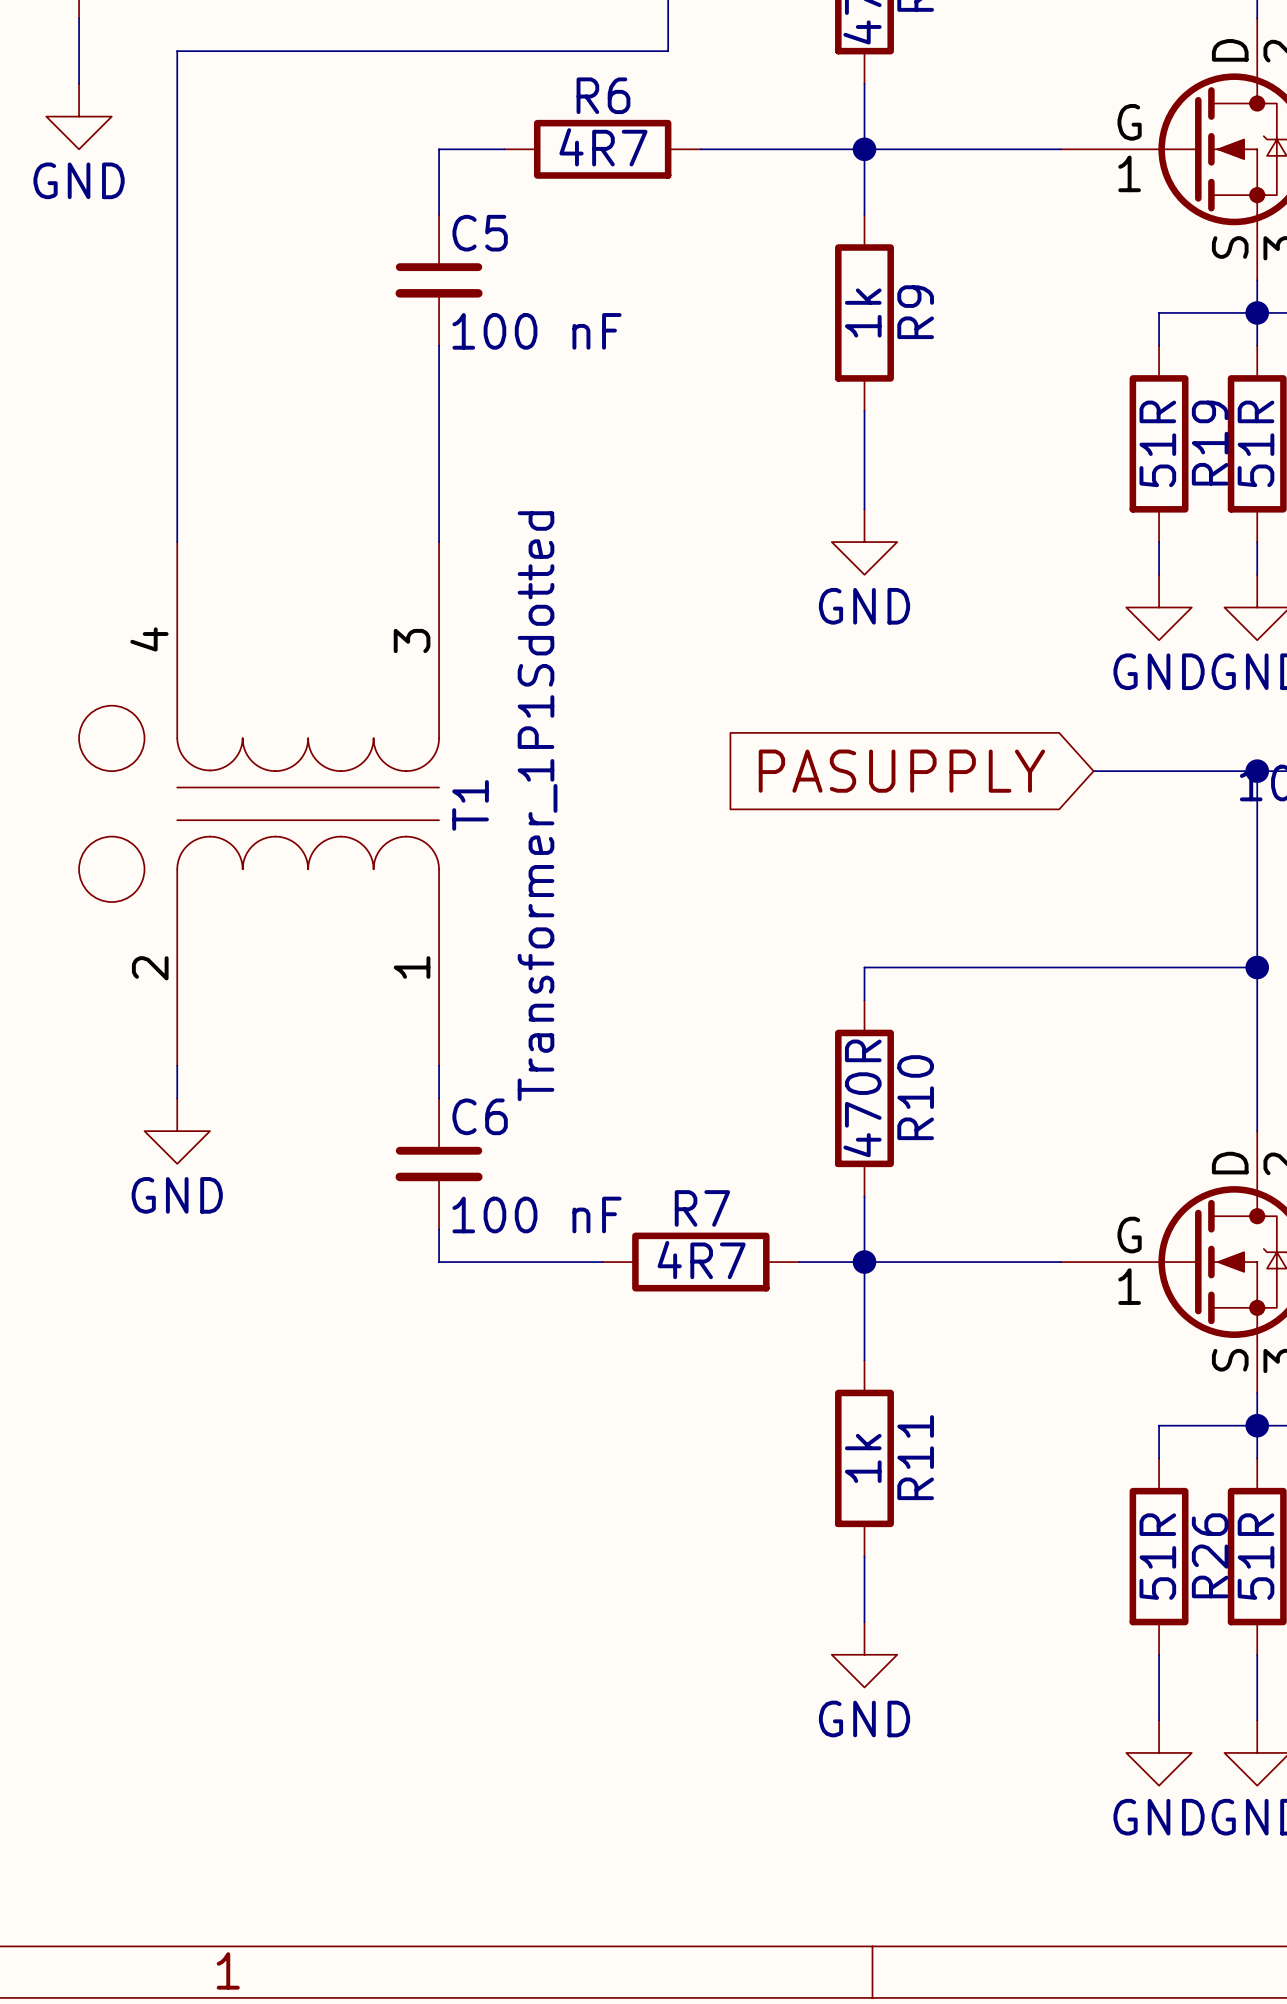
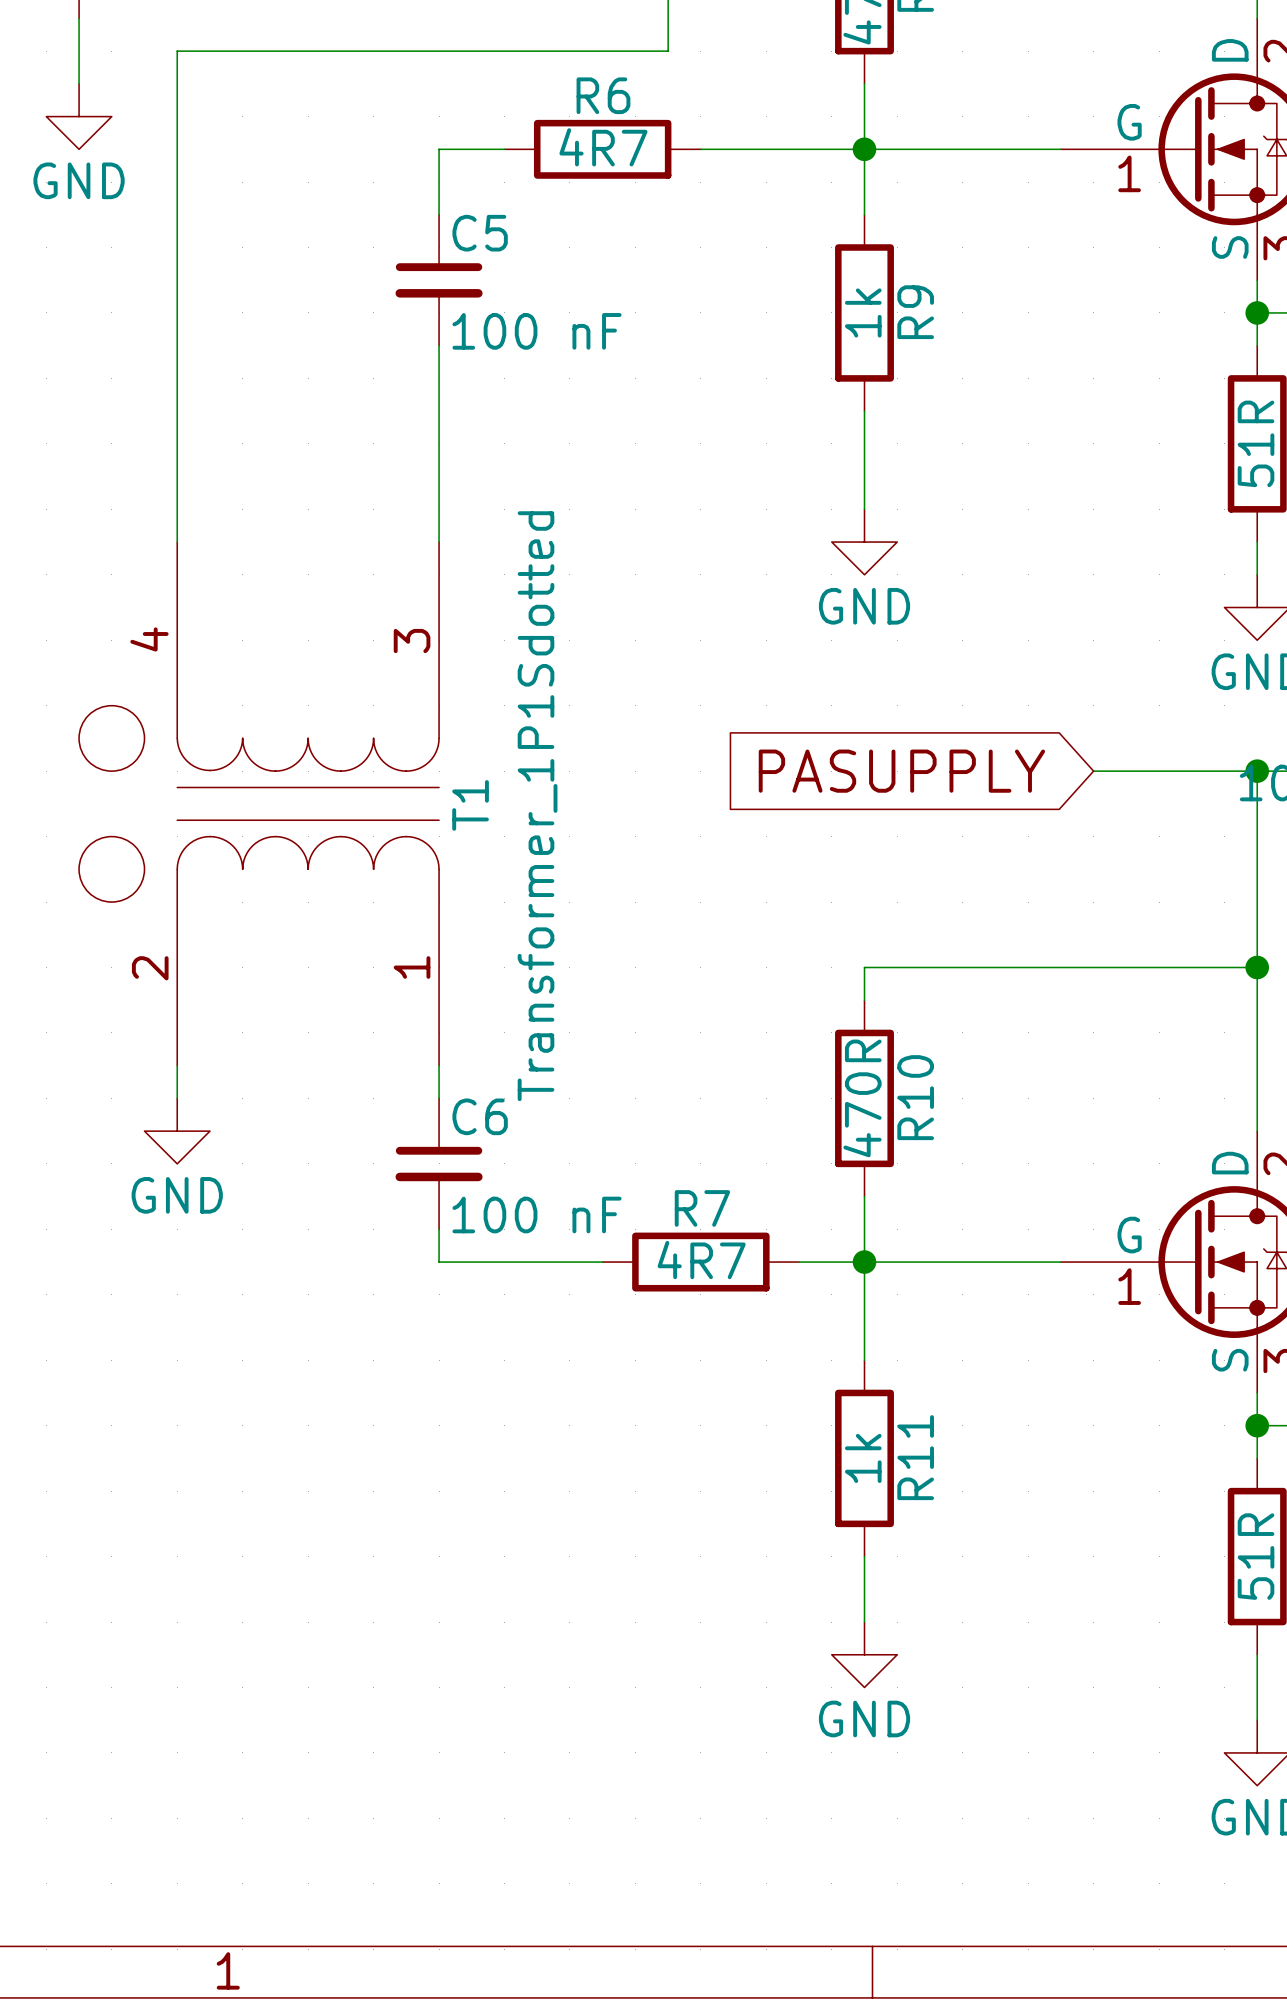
wire: (1257, 312) (1159, 312) (1159, 345) -> none
R19: 51R (1159, 443) -> none
wire: (1159, 542) (1159, 574) -> none
power symbol: GND (1159, 607) -> none
wire: (1257, 1425) (1159, 1425) (1159, 1458) -> none
R26: 51R (1159, 1556) -> none
wire: (1159, 1654) (1159, 1720) -> none
power symbol: GND (1159, 1752) -> none

